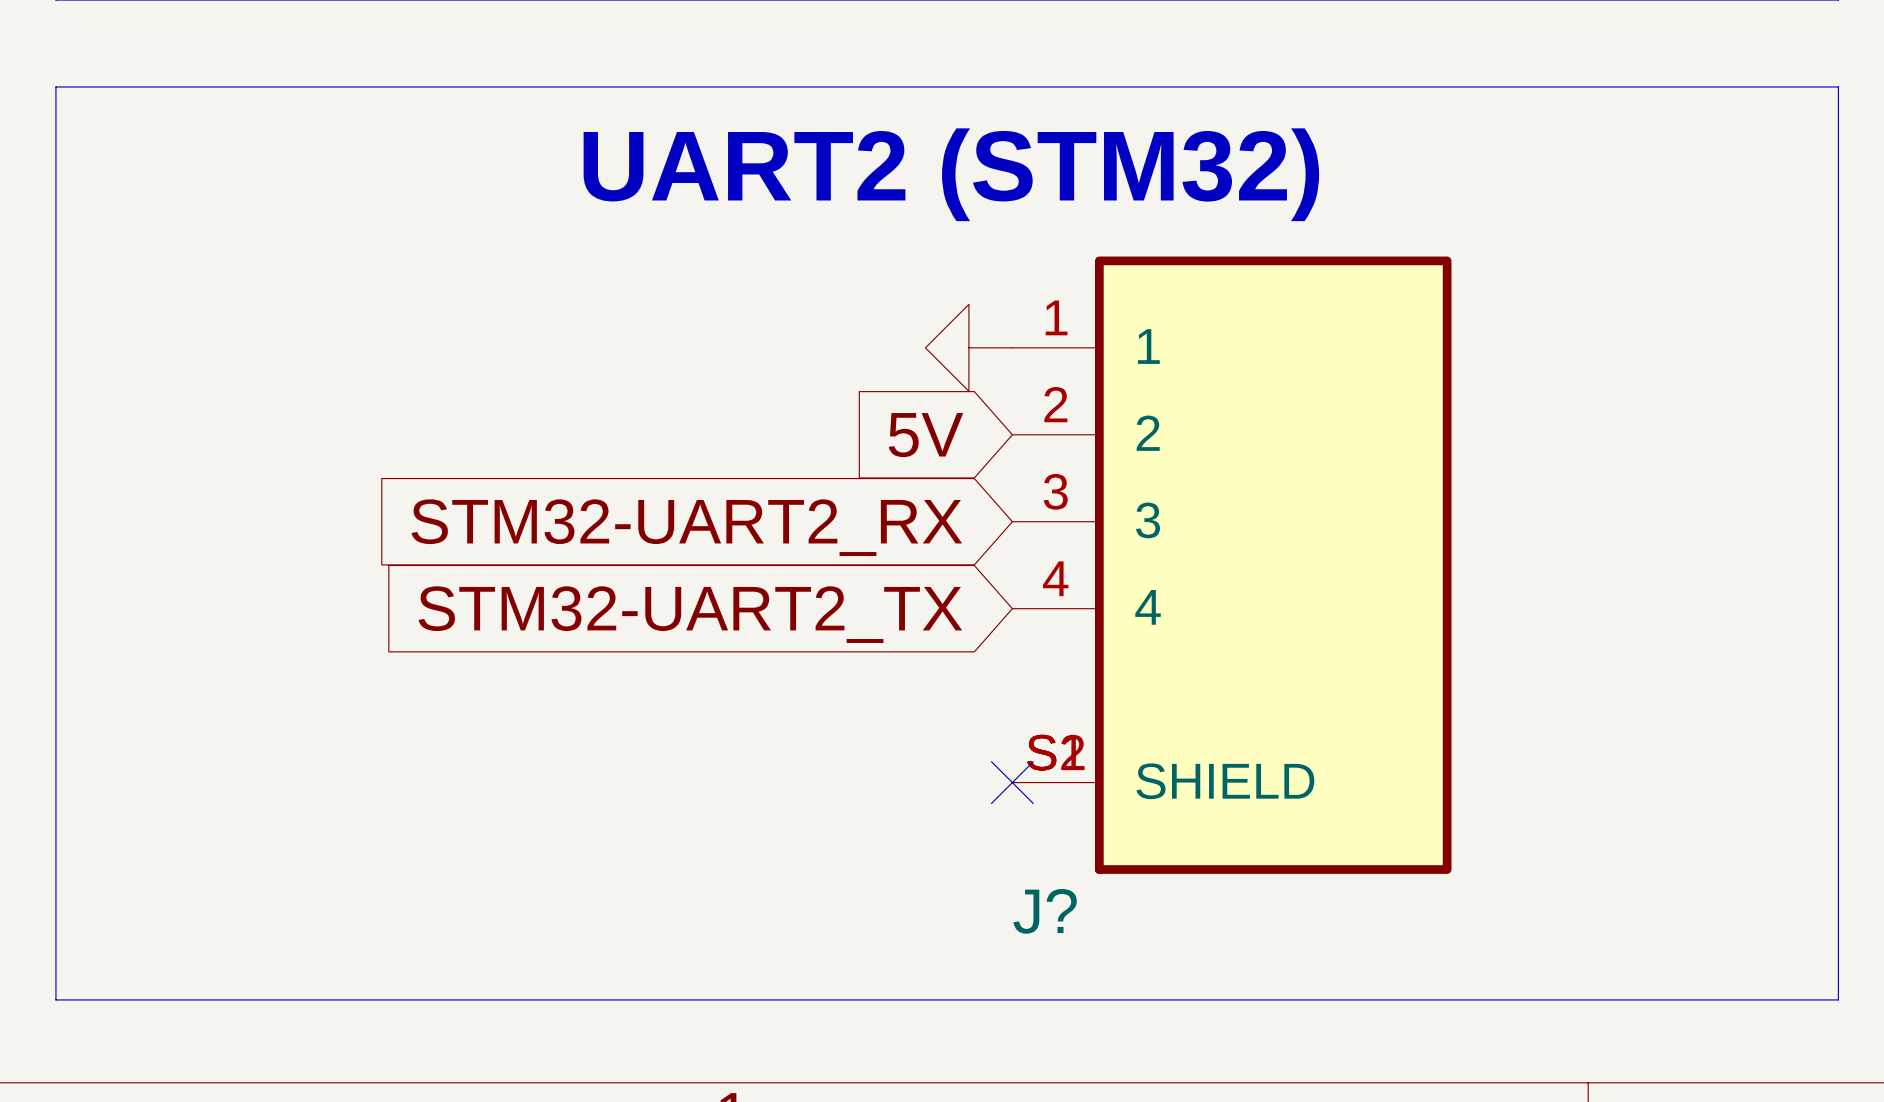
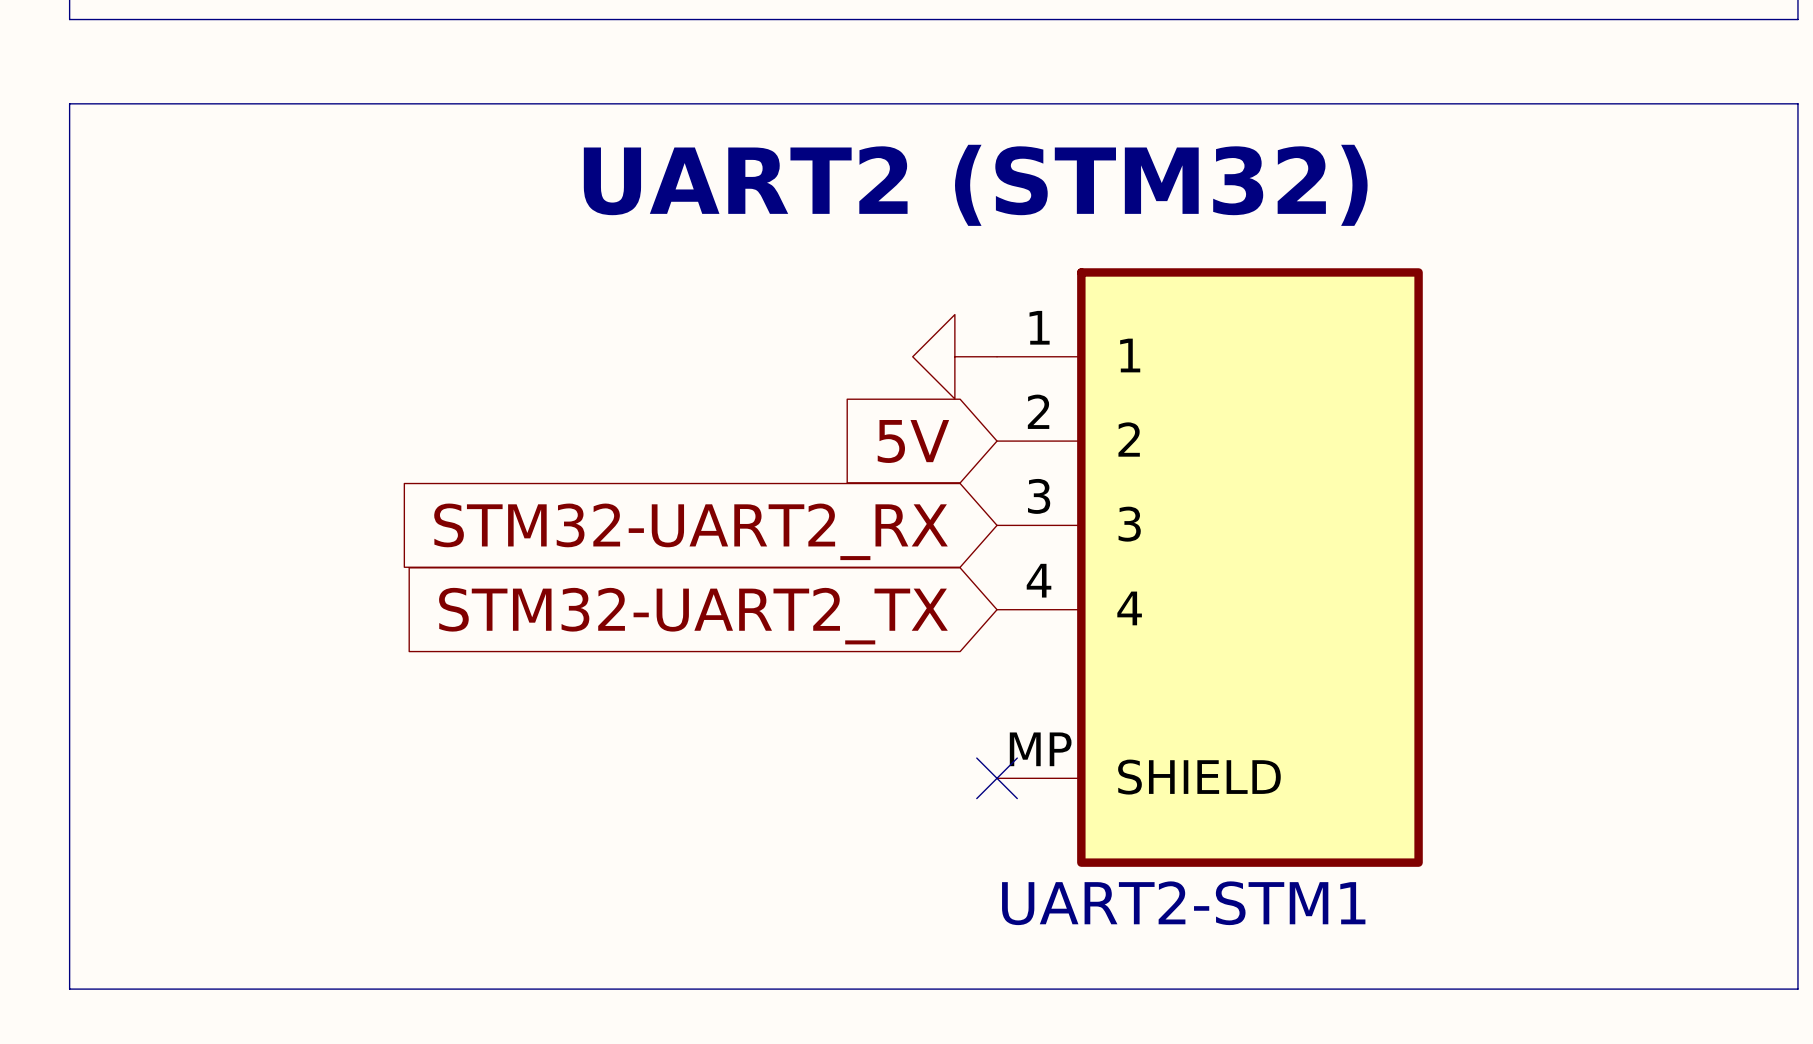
J? symbol: [1012, 256, 1452, 874] -> [997, 268, 1423, 867]
J? name: J? (1045, 911) -> UART2-STM1 (1183, 903)

